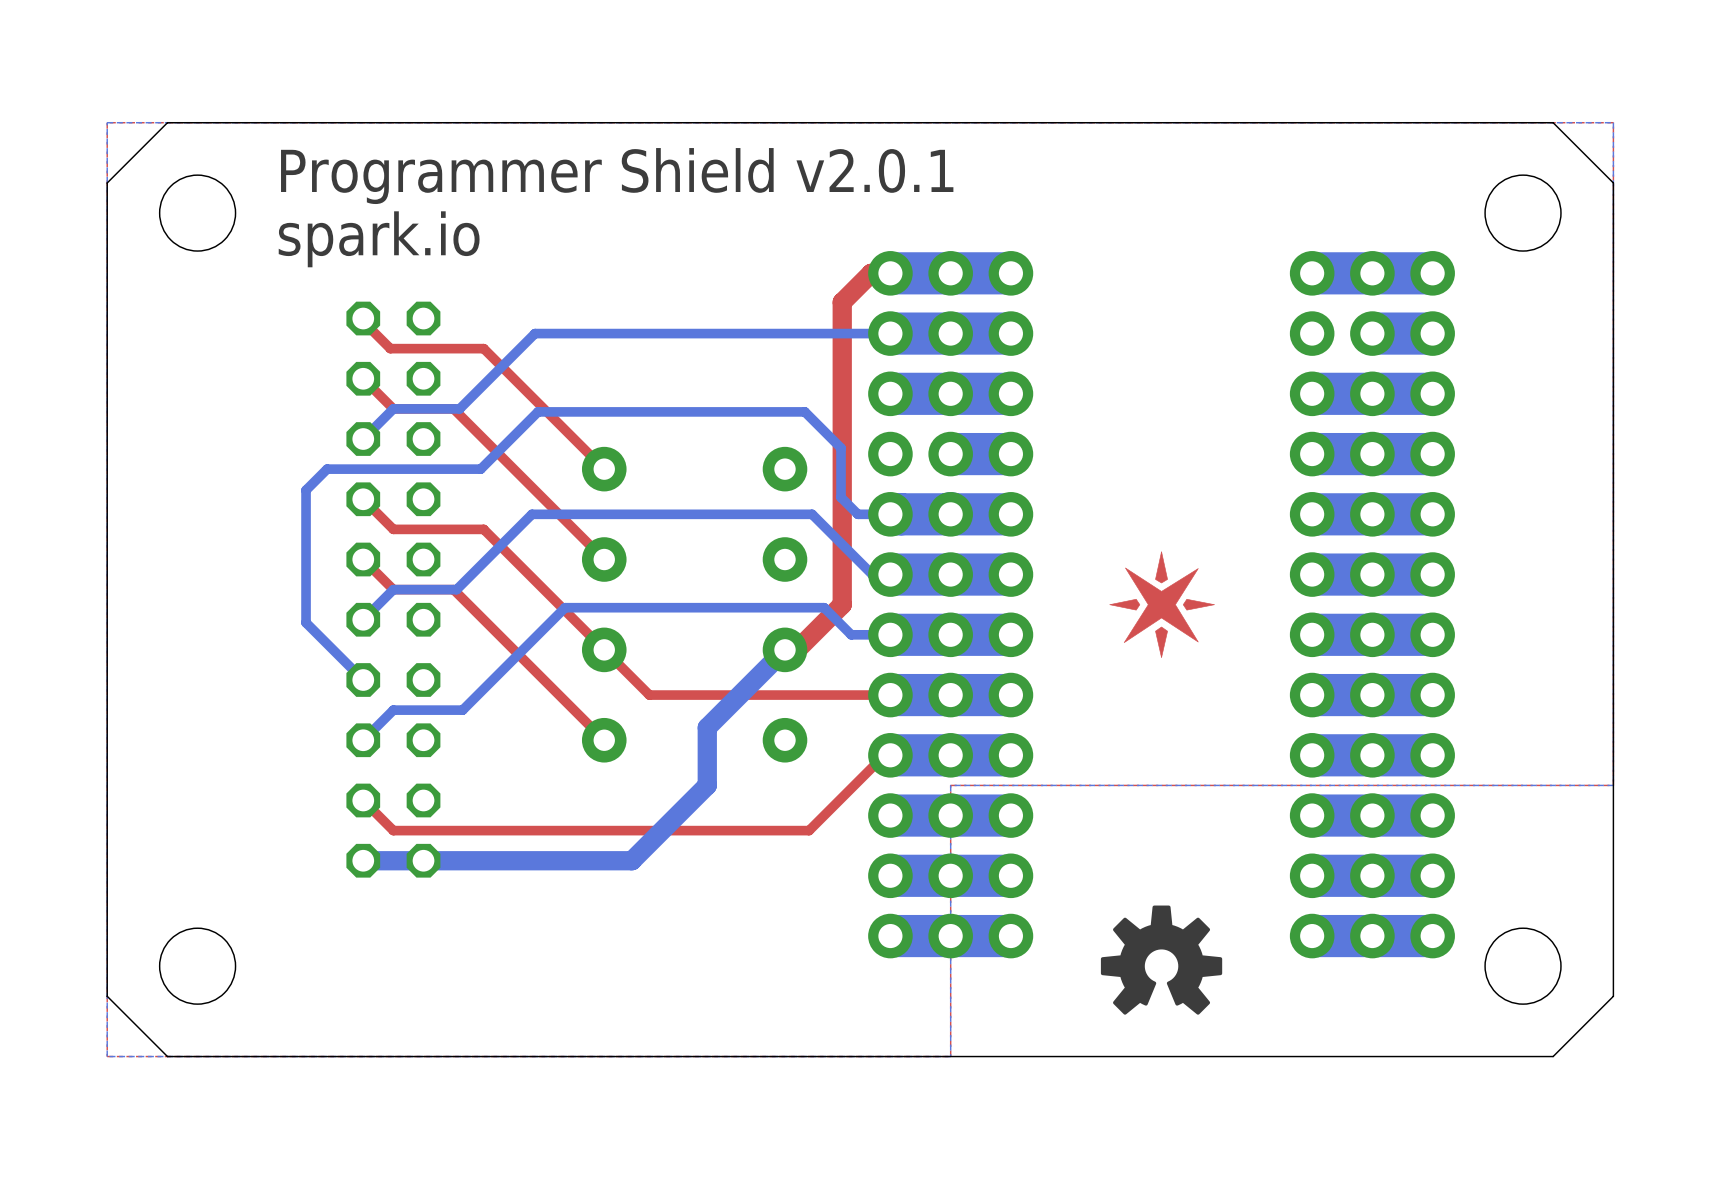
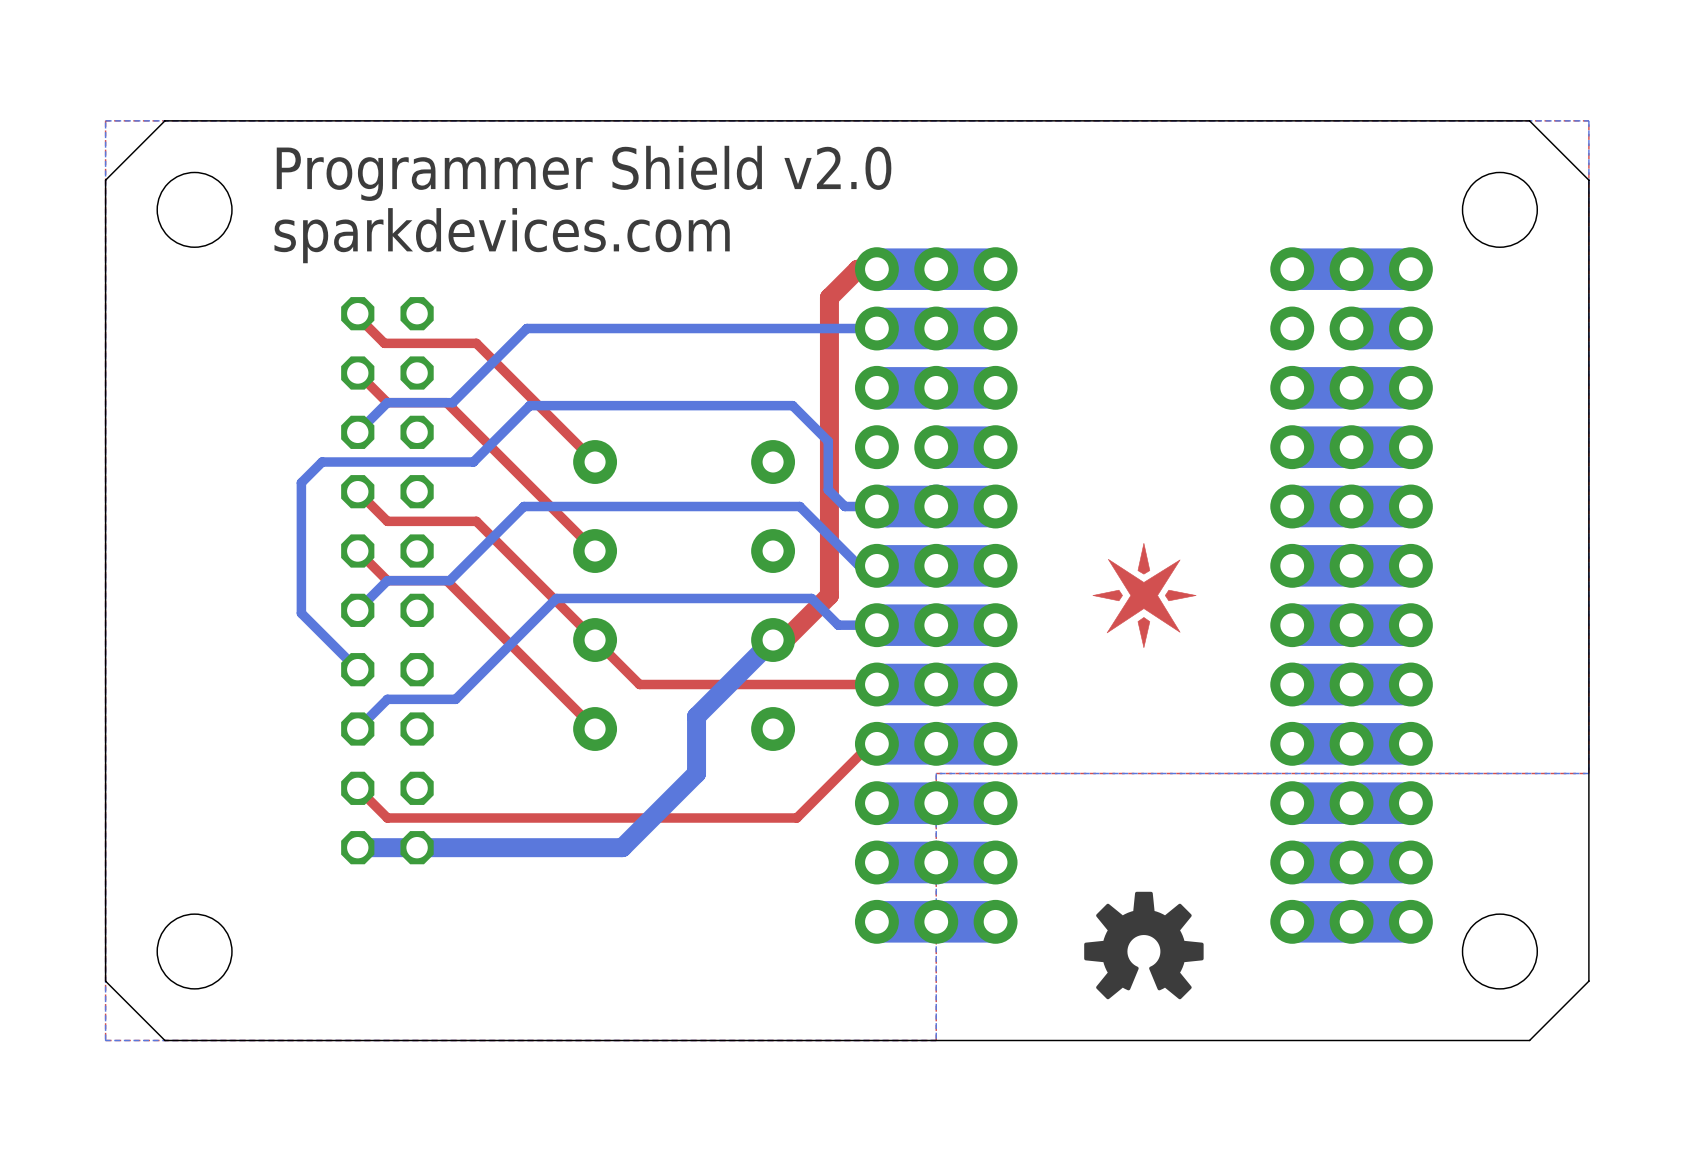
text: Programmer Shield v2.0.1 (617, 176) -> Programmer Shield v2.0 (584, 173)
text: spark.io (379, 239) -> sparkdevices.com (502, 235)

